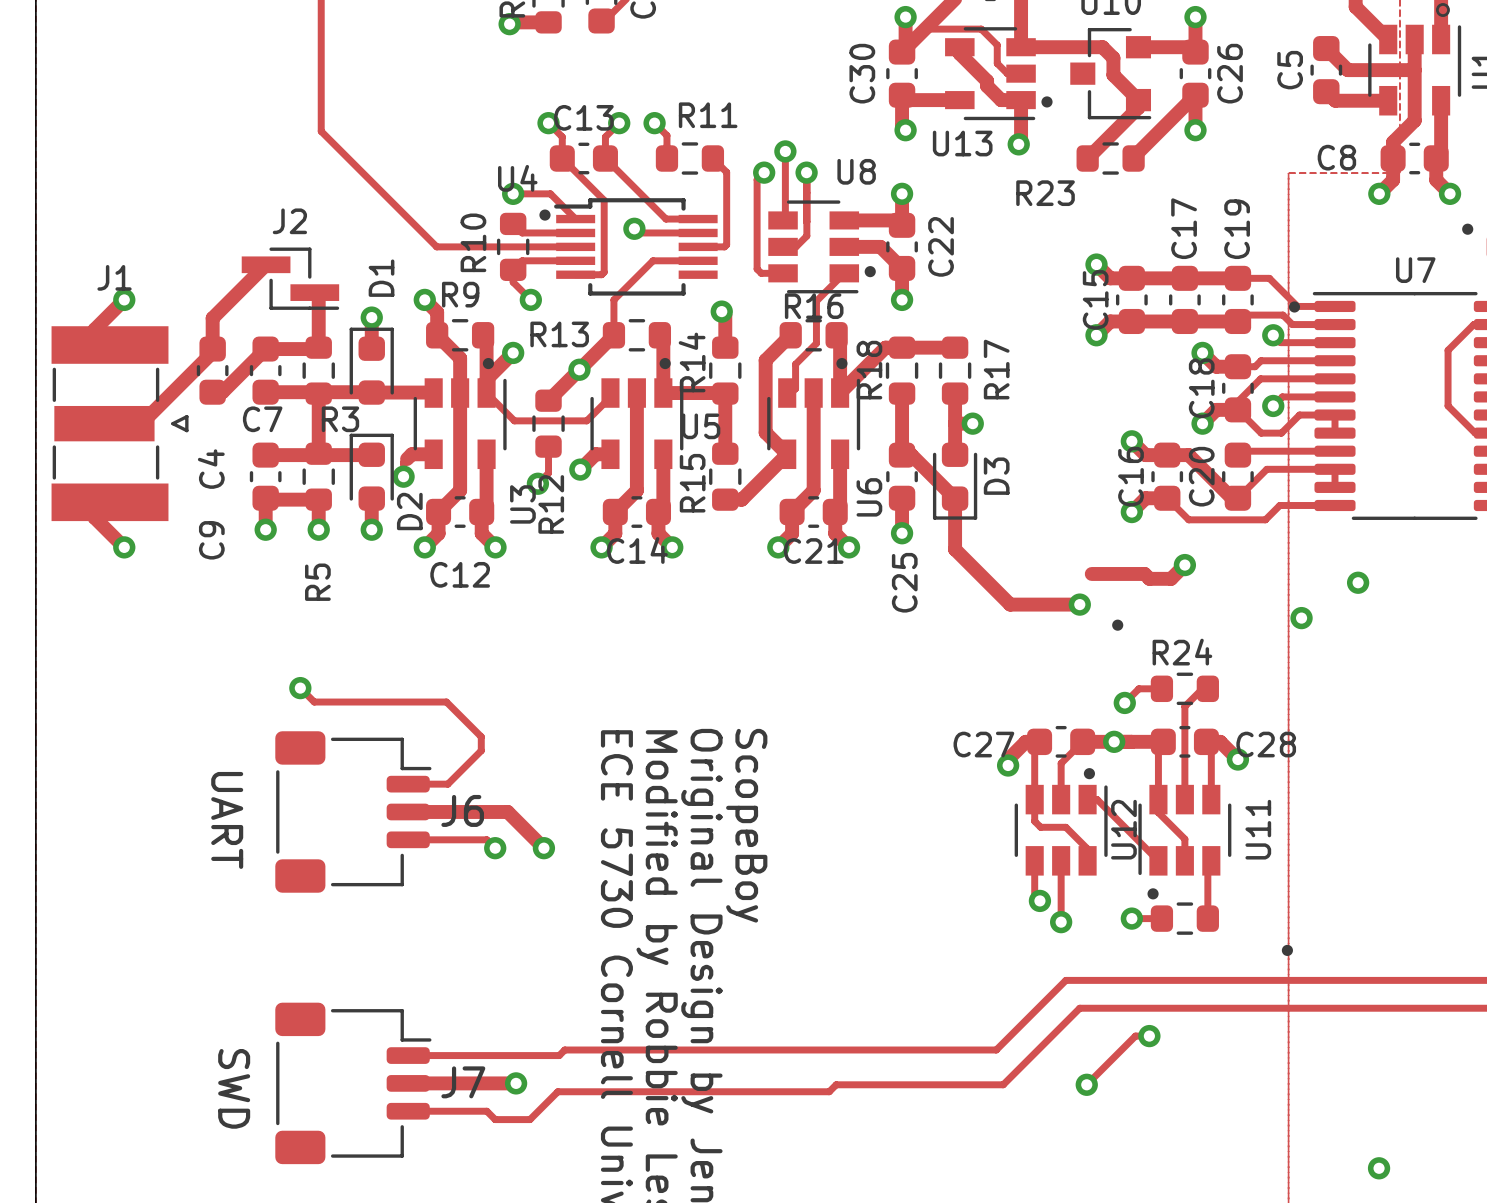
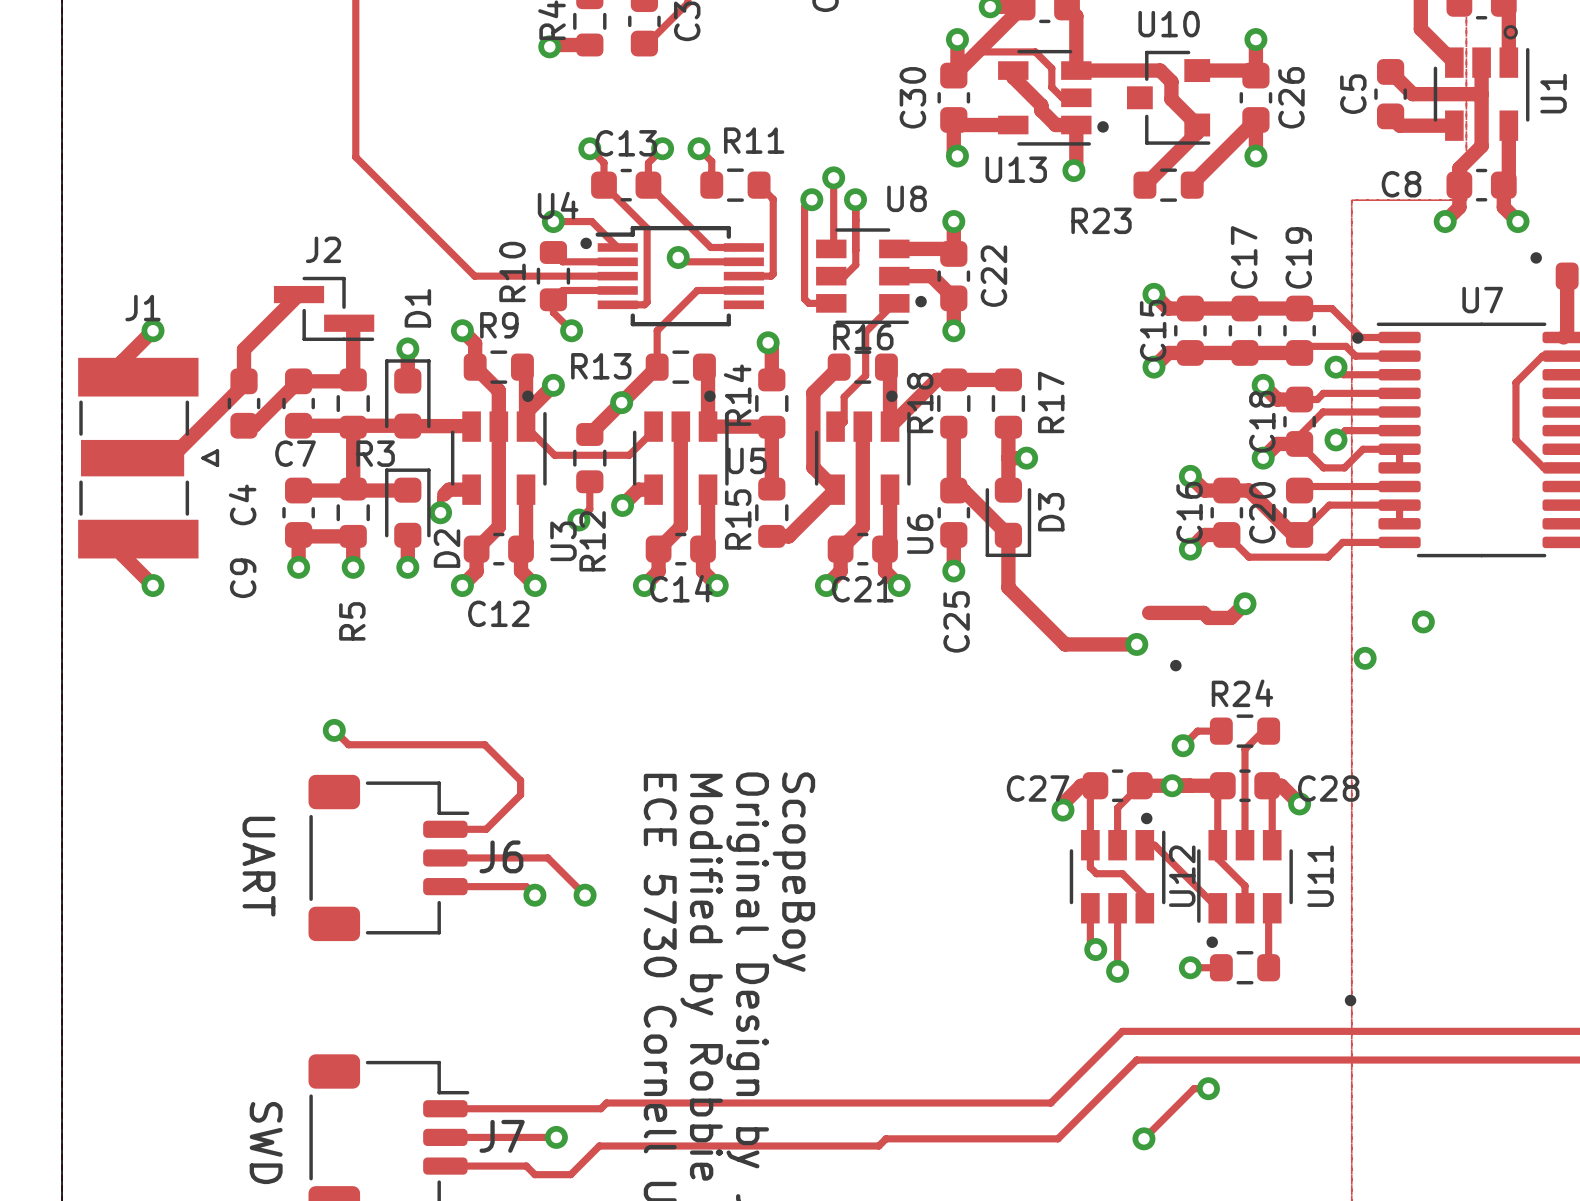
track width: thick (408, 811) (507, 811) (543, 848) -> thin (445, 857) (547, 857) (585, 895)
track width: thick (408, 1083) (516, 1083) -> thin (445, 1137) (556, 1137)

